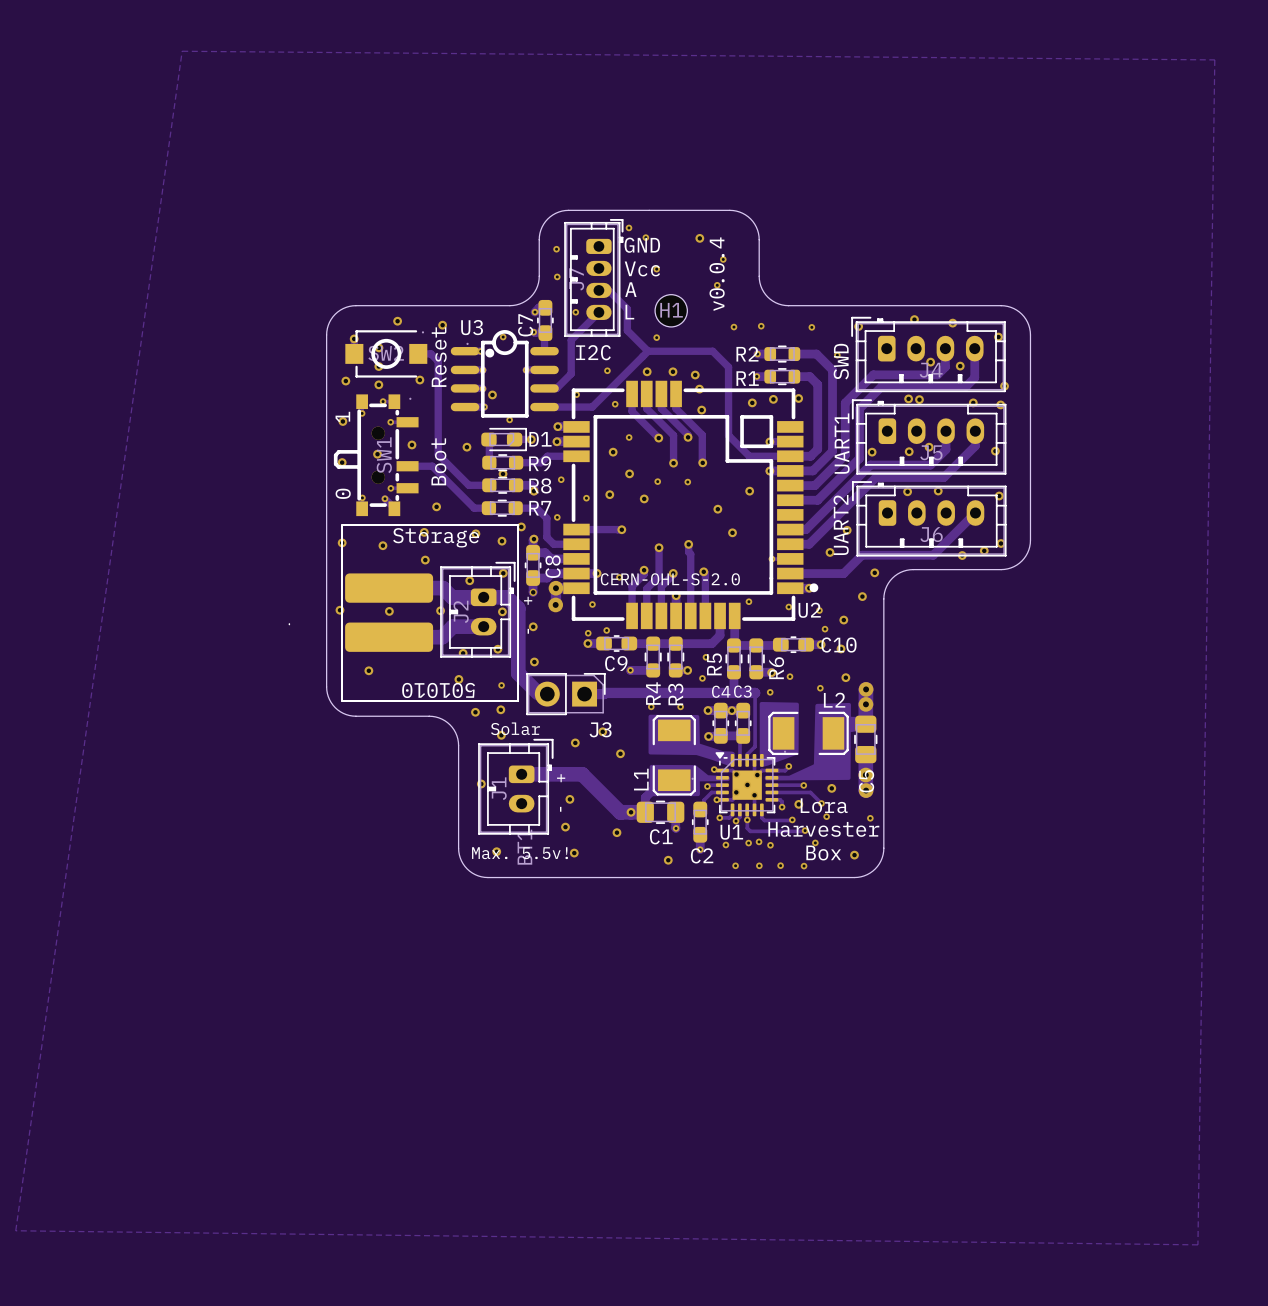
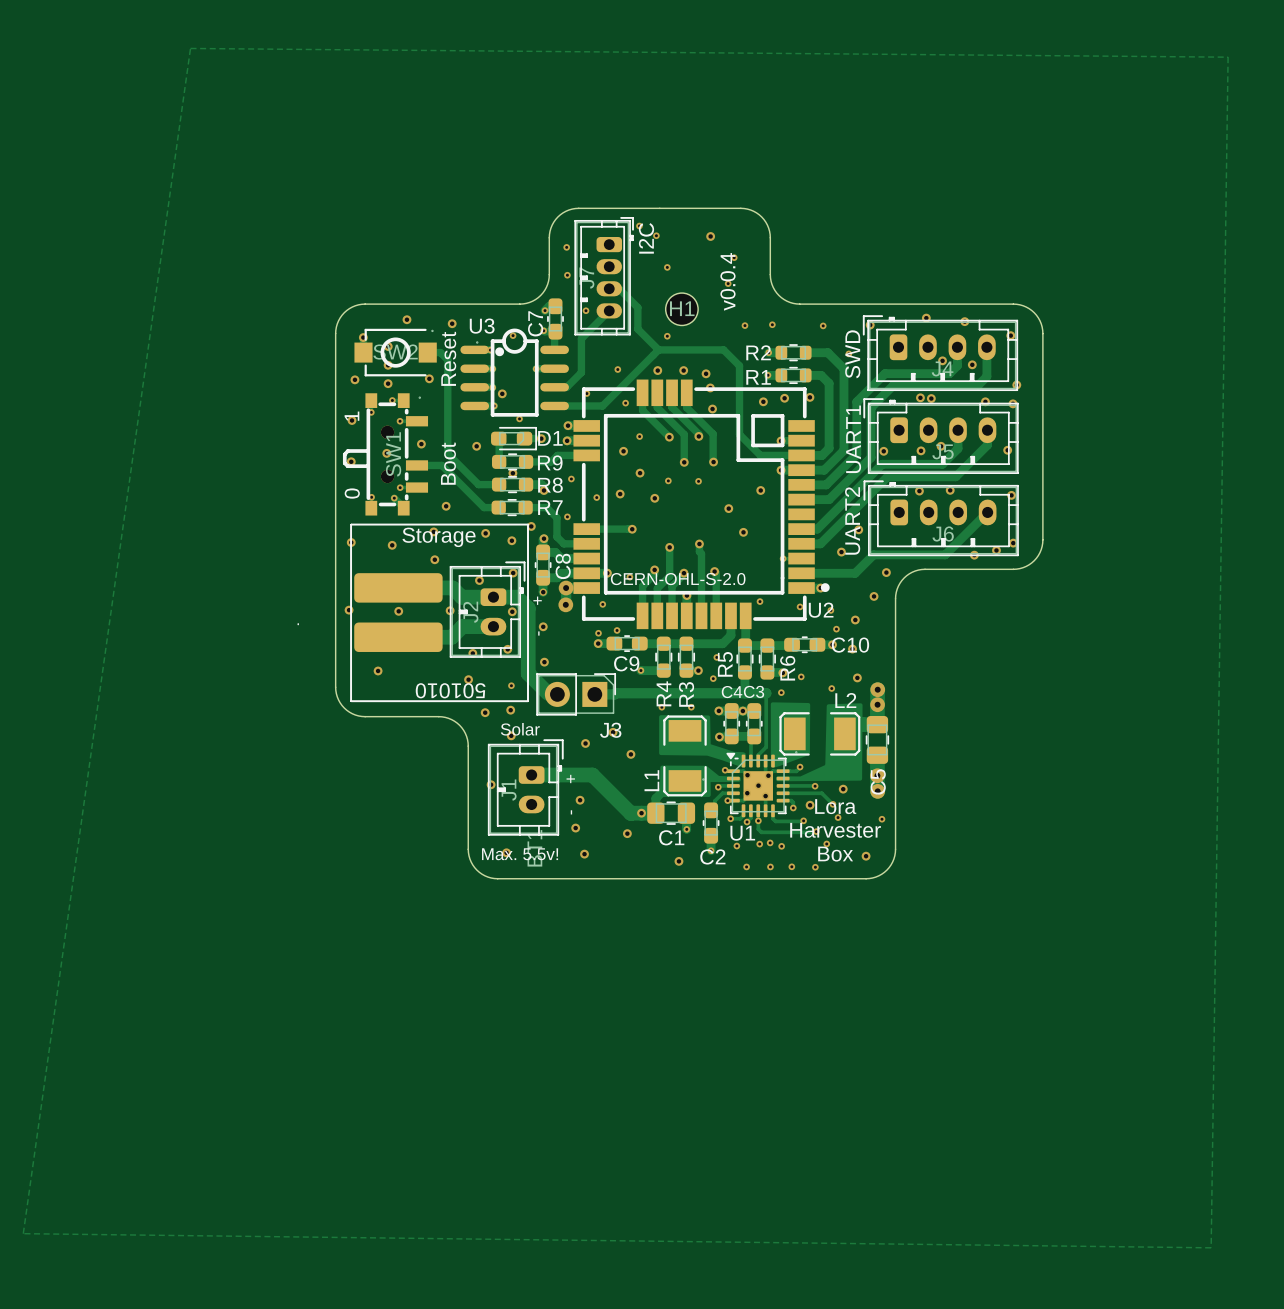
text: GND (642, 245) -> none
text: Vcc (642, 268) -> none
text: A (630, 289) -> none
text: L (629, 312) -> none
text rotation: 0° (593, 352) -> 90° counterclockwise (646, 238)
text position: I2C (593, 352) -> I2C (646, 238)

